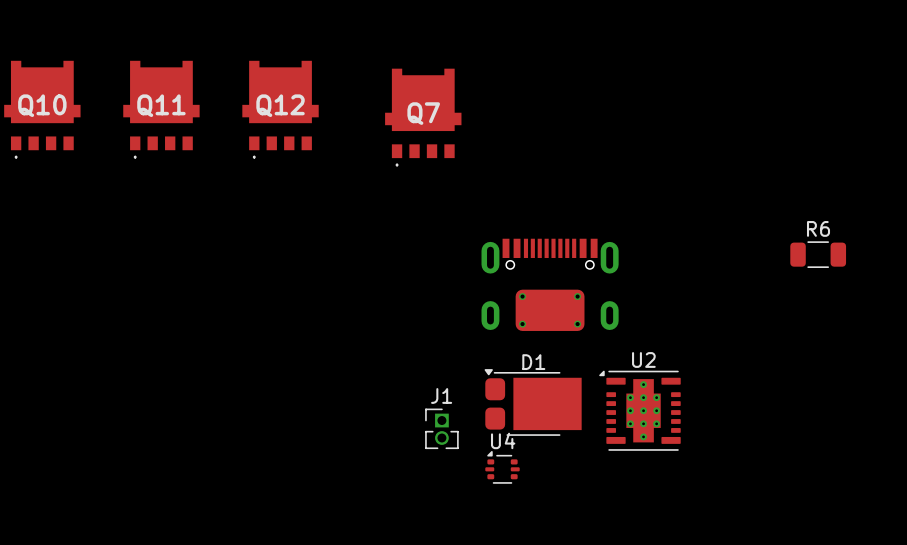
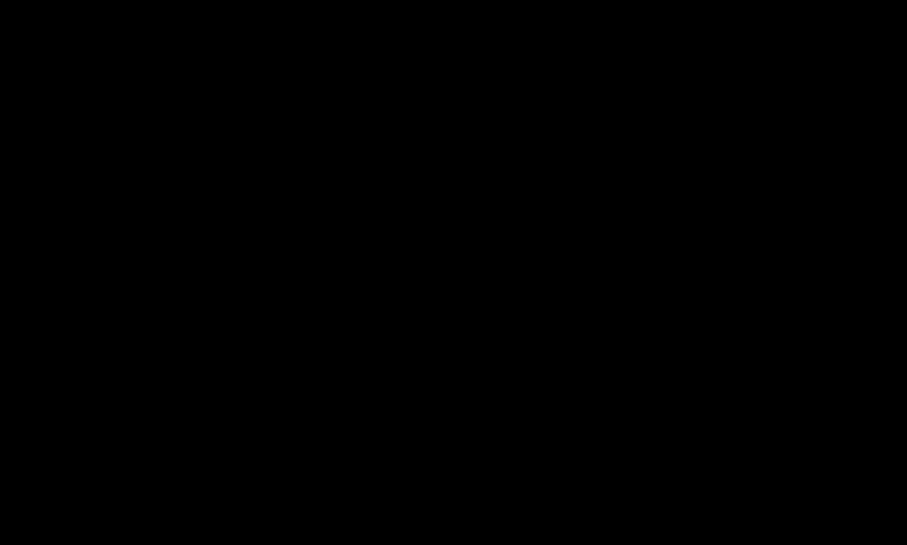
Q10: (42, 109) -> none
Q11: (161, 109) -> none
Q12: (280, 109) -> none
Q7: (423, 117) -> none
R6: (818, 254) -> none
part: (550, 284) -> none
D1: (533, 402) -> none
U2: (639, 410) -> none
J1: (441, 428) -> none
U4: (502, 467) -> none

